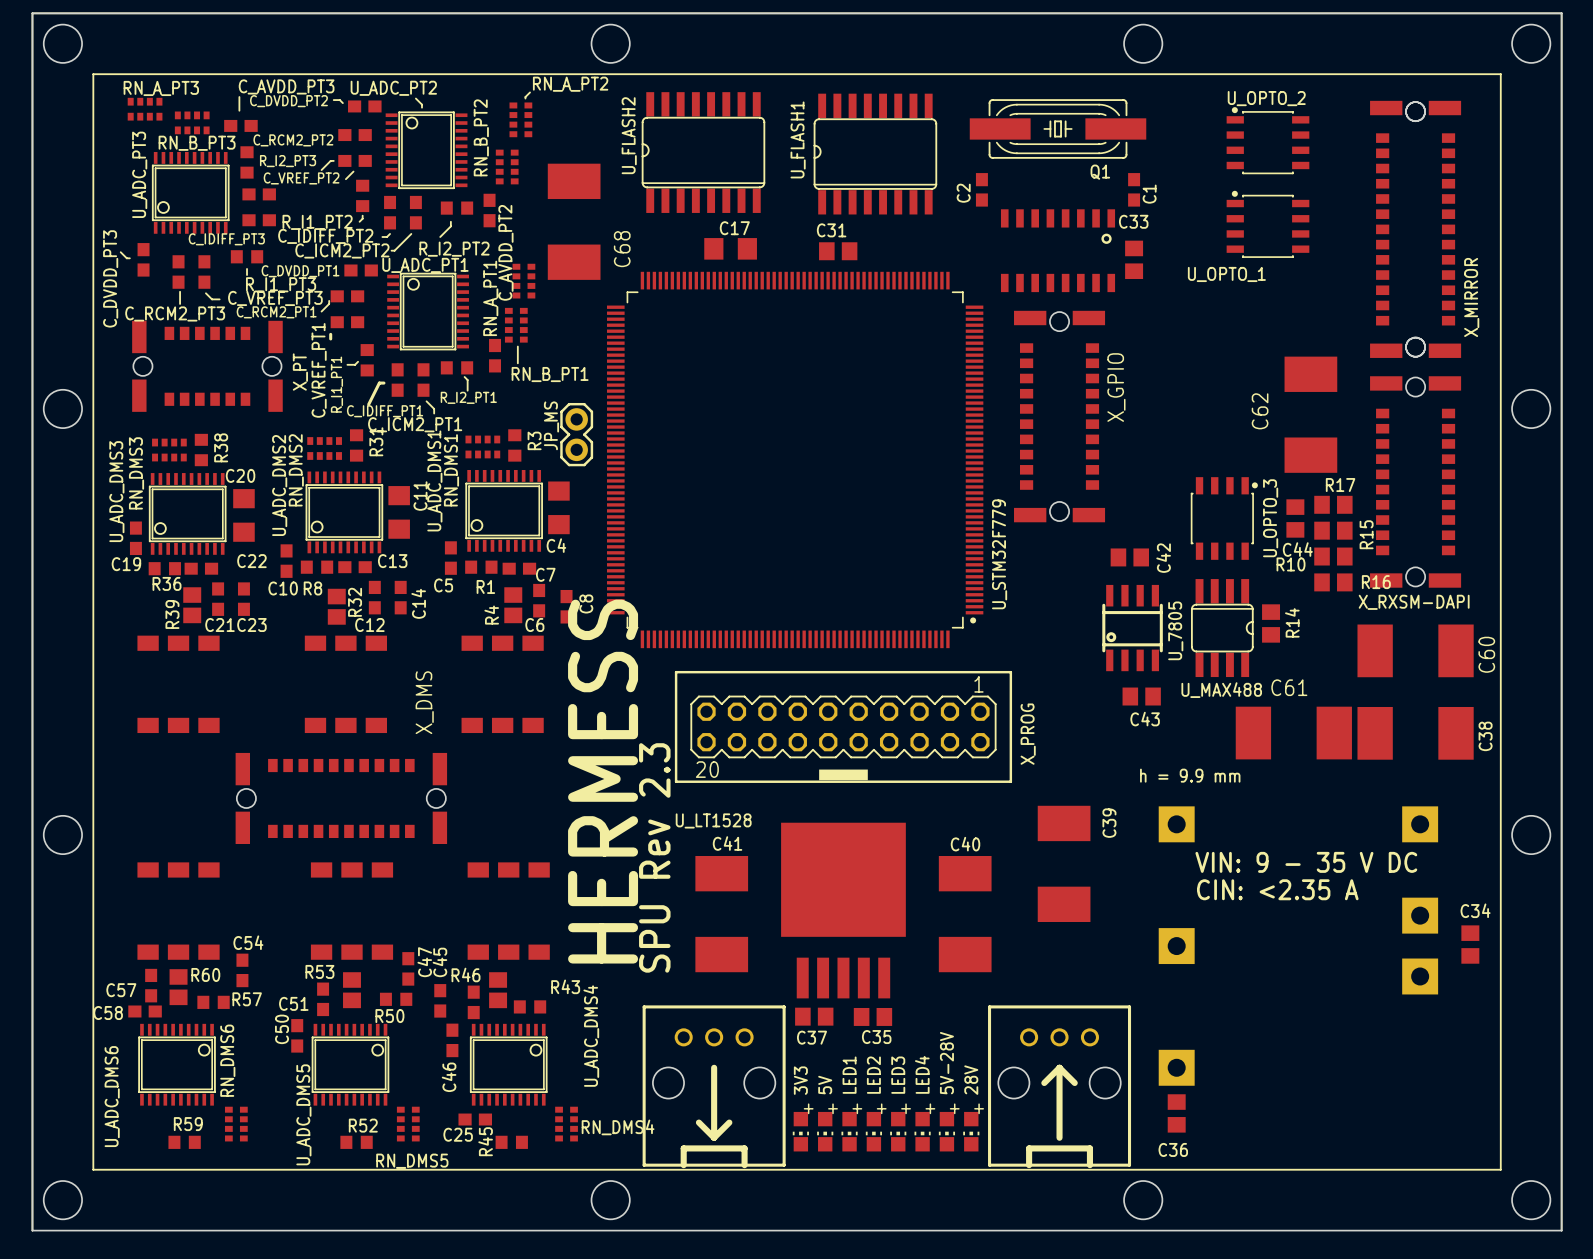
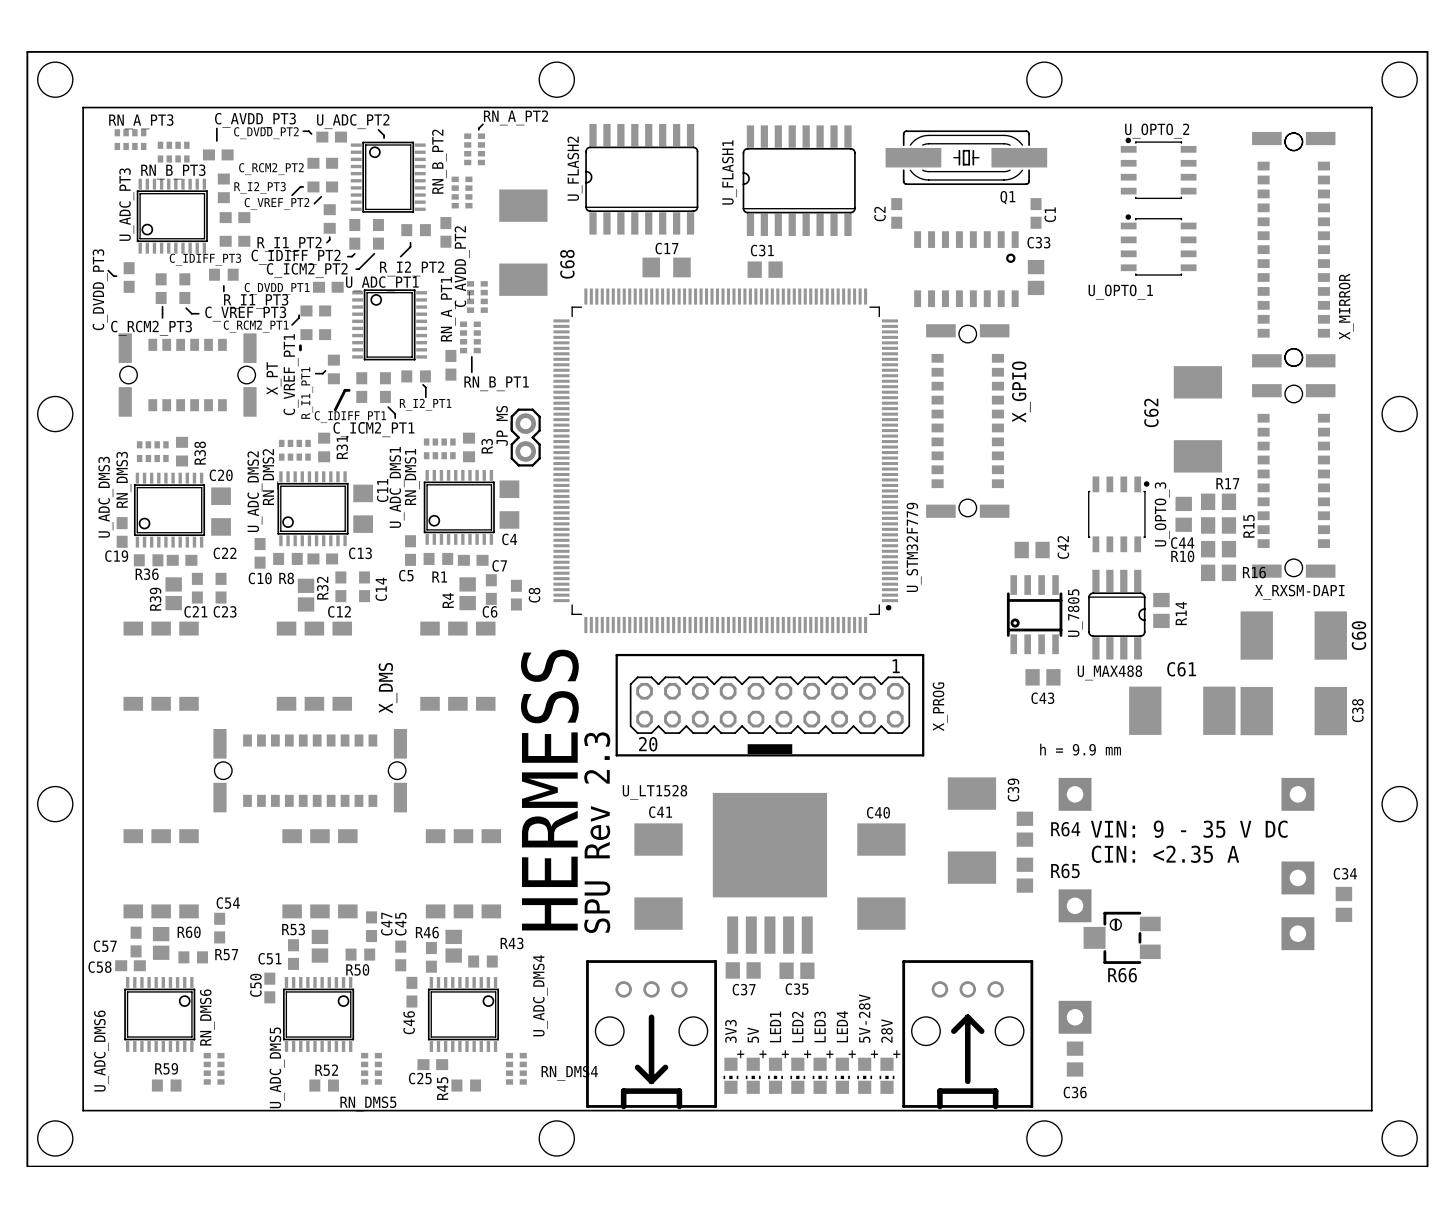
R64: none -> (1024, 829)
R65: none -> (1024, 875)
R66: none -> (1122, 937)

